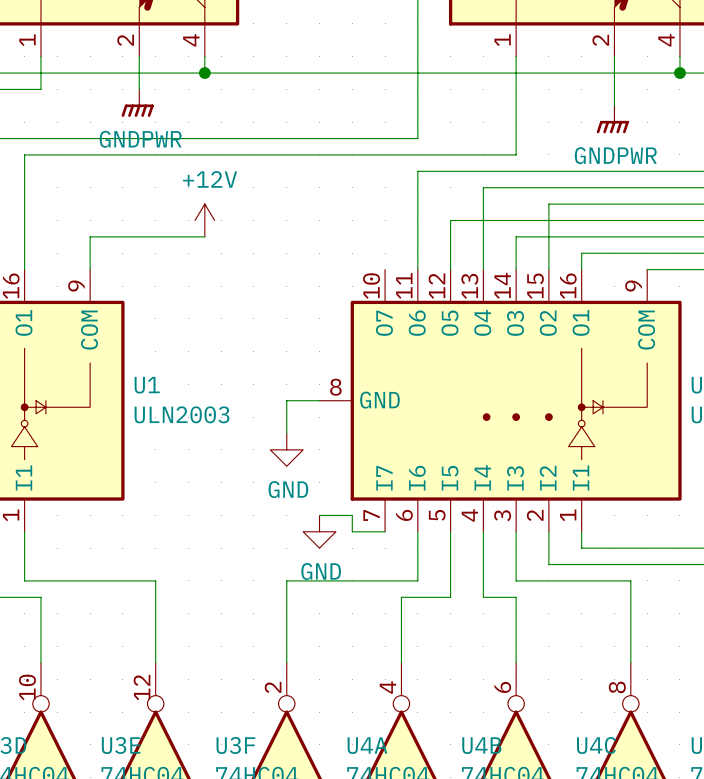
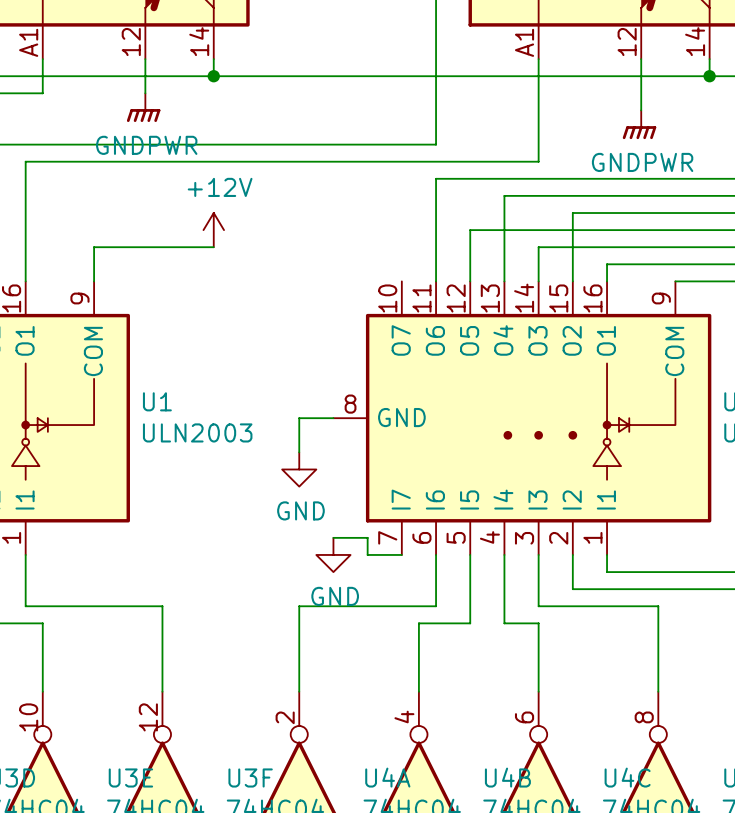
part pin number: 1 (27, 40) -> A1 (28, 42)
part pin number: 2 (125, 40) -> 12 (131, 42)
part pin number: 4 (191, 40) -> 14 (199, 41)
part pin number: 1 (502, 40) -> A1 (524, 42)
part pin number: 2 (600, 40) -> 12 (627, 42)
part pin number: 4 (666, 40) -> 14 (695, 41)

